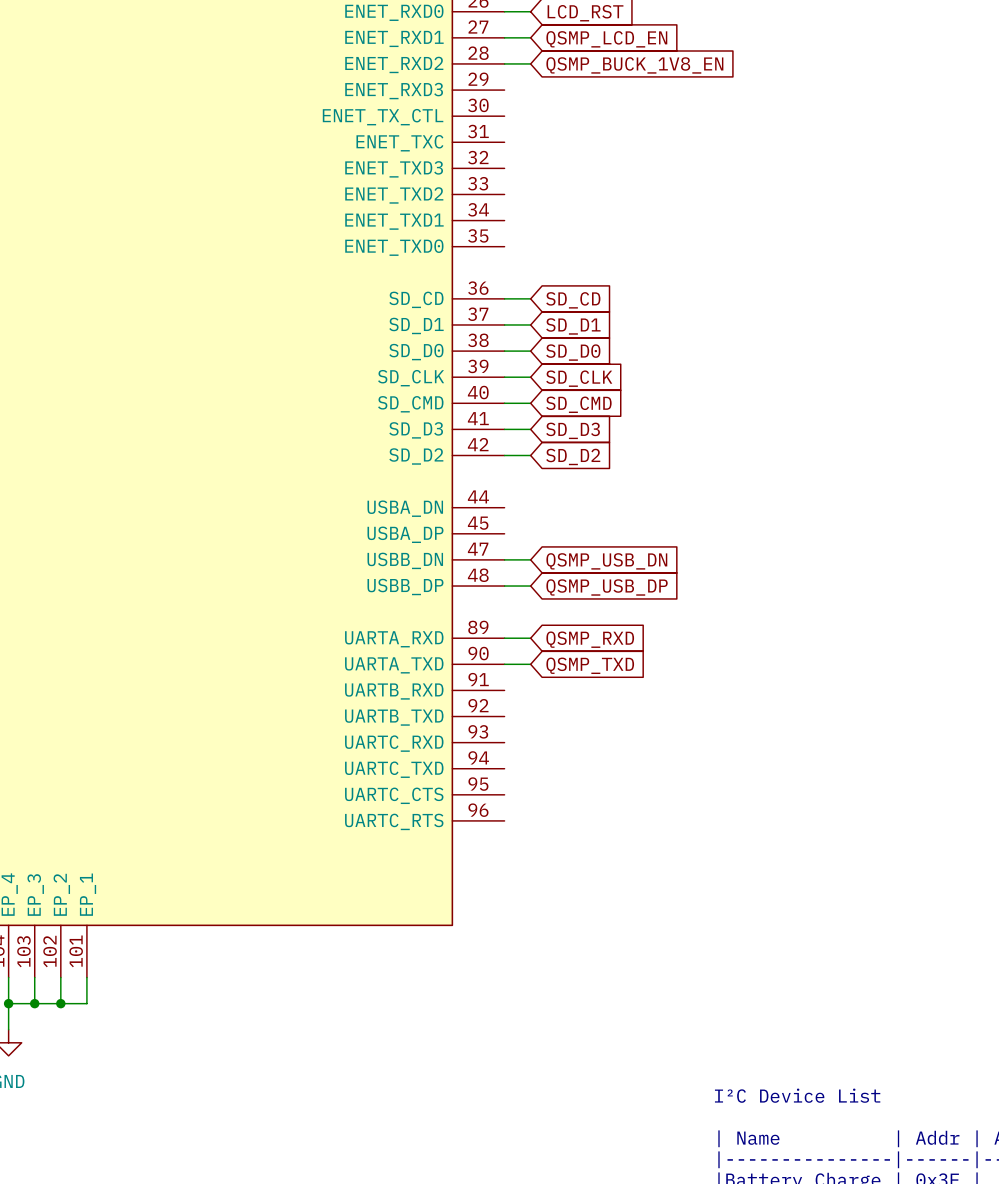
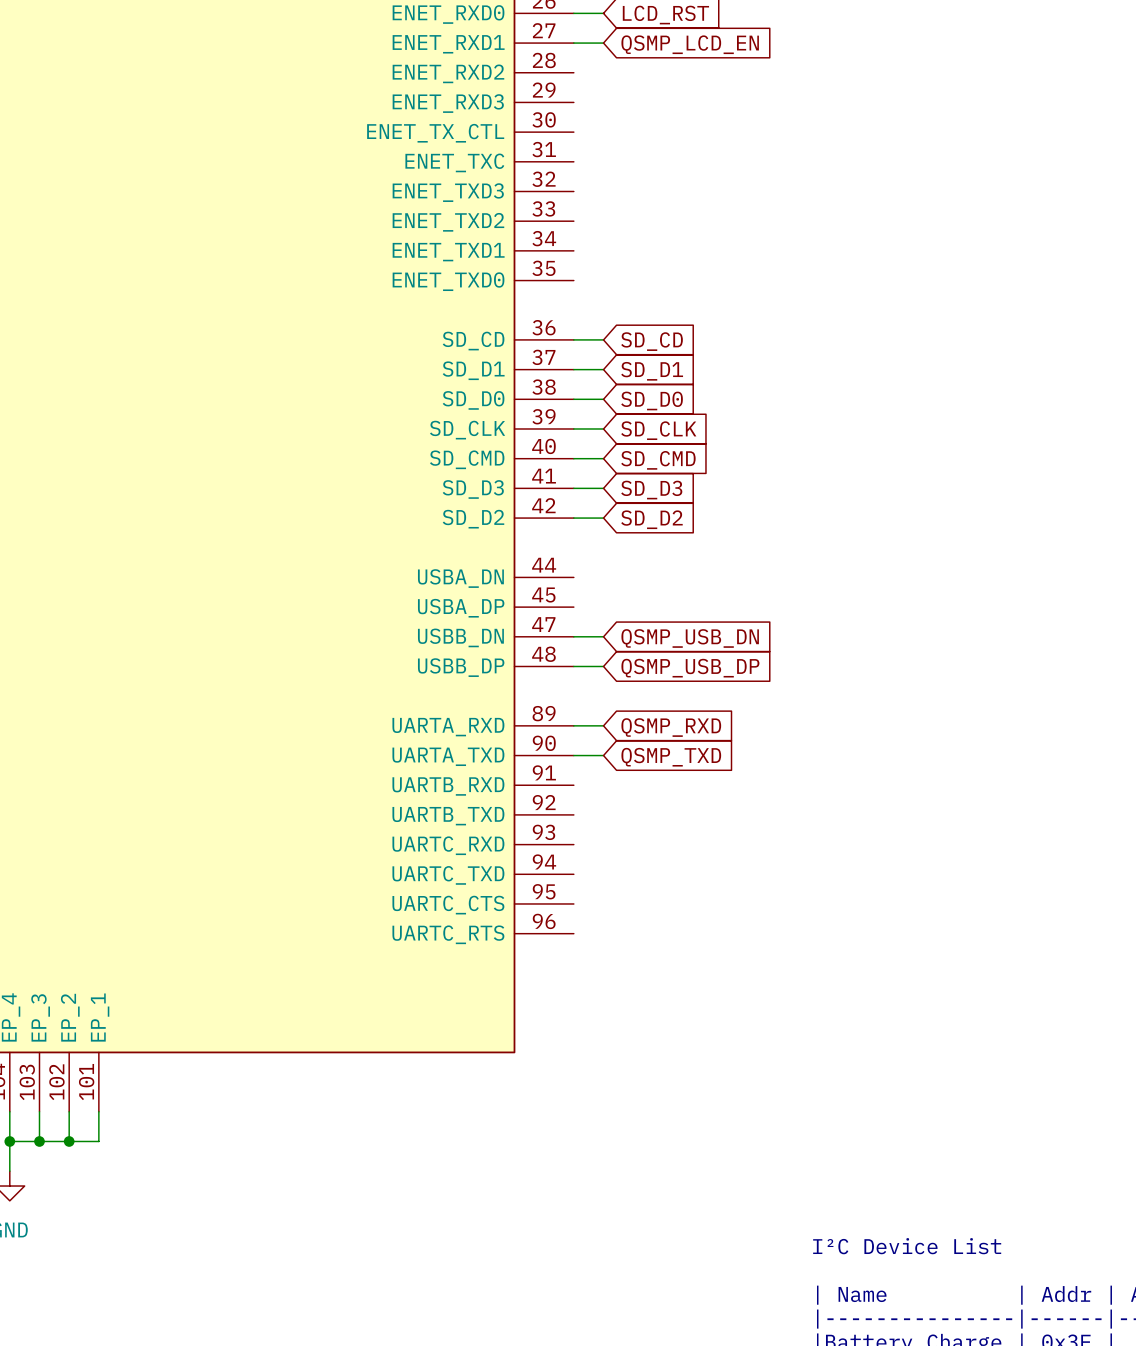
wire: (504, 63) (530, 63) -> none
global label: QSMP_BUCK_1V8_EN (634, 65) -> none

